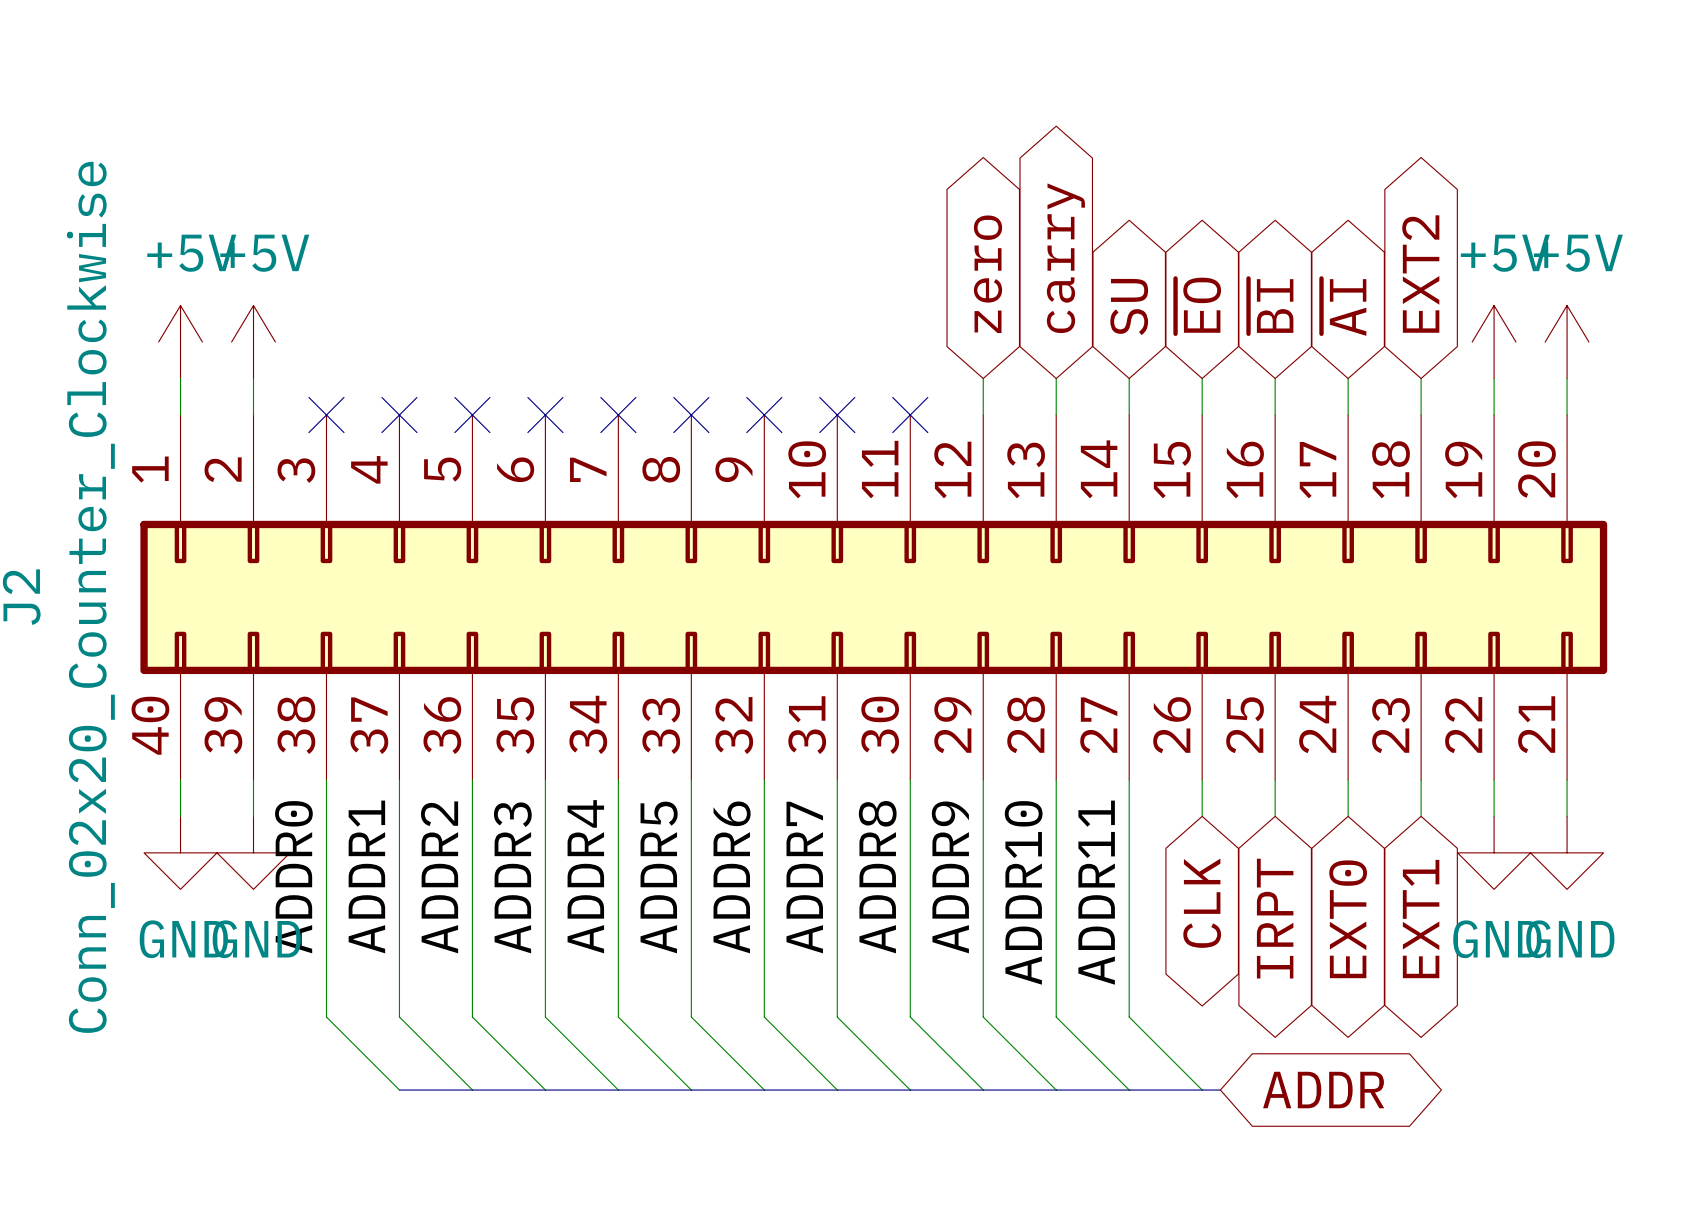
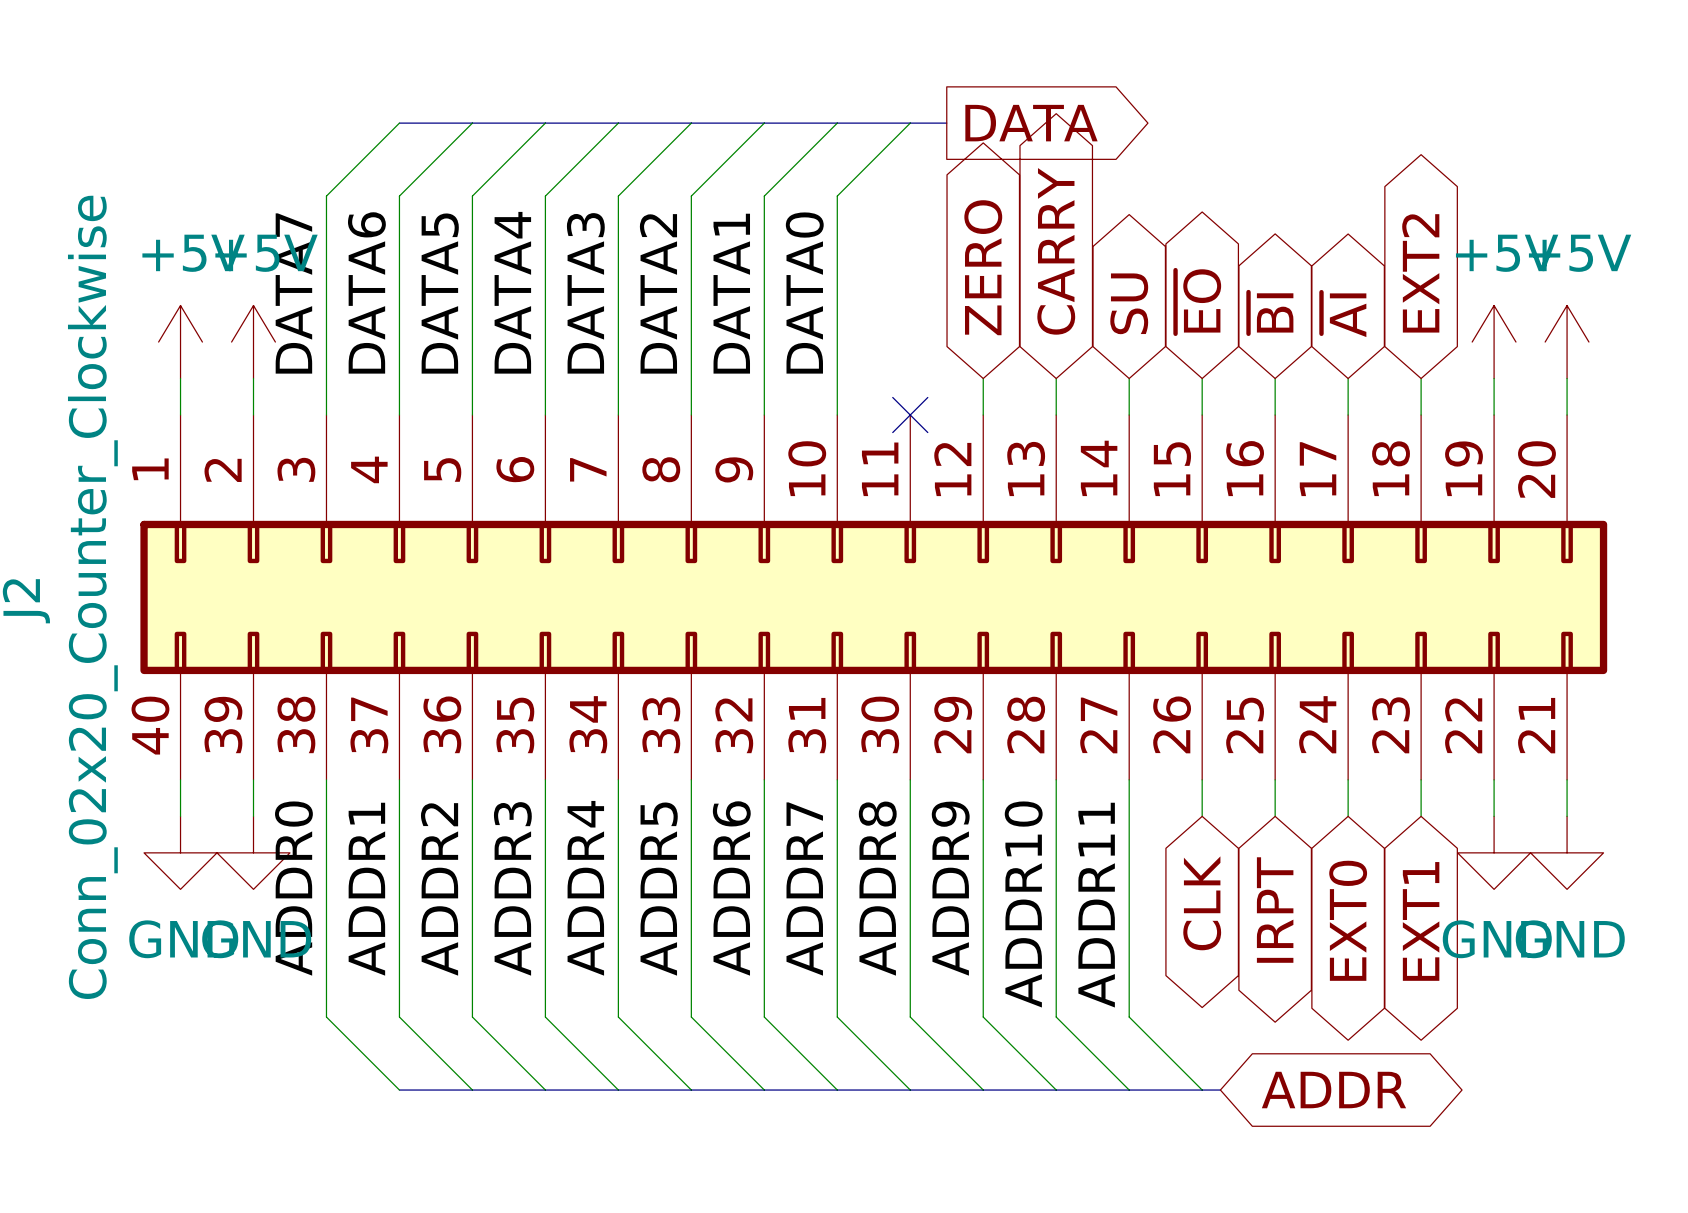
wire: none -> (399, 123) (326, 196) (326, 415)
bus: none -> (399, 123) (946, 123)
wire: none -> (472, 123) (399, 196) (399, 415)
wire: none -> (545, 123) (472, 196) (472, 415)
wire: none -> (618, 123) (545, 196) (545, 415)
wire: none -> (691, 123) (618, 196) (618, 415)
wire: none -> (764, 123) (691, 196) (691, 415)
wire: none -> (837, 123) (764, 196) (764, 415)
wire: none -> (910, 123) (837, 196) (837, 415)
global label: none -> DATA (1031, 123)
global label: carry (1065, 258) -> CARRY (1056, 251)
global label: zero (988, 274) -> ZERO (983, 267)
label: none -> DATA4 (512, 292)
label: none -> DATA1 (731, 293)
label: none -> DATA7 (293, 293)
label: none -> DATA6 (366, 292)
label: none -> DATA5 (440, 293)
label: none -> DATA3 (585, 293)
label: none -> DATA2 (658, 293)
label: none -> DATA0 (804, 293)
no-connect mark: (326, 415) -> none
no-connect mark: (399, 415) -> none
no-connect mark: (472, 415) -> none
no-connect mark: (545, 415) -> none
no-connect mark: (618, 415) -> none
no-connect mark: (691, 415) -> none
no-connect mark: (764, 415) -> none
no-connect mark: (837, 415) -> none

